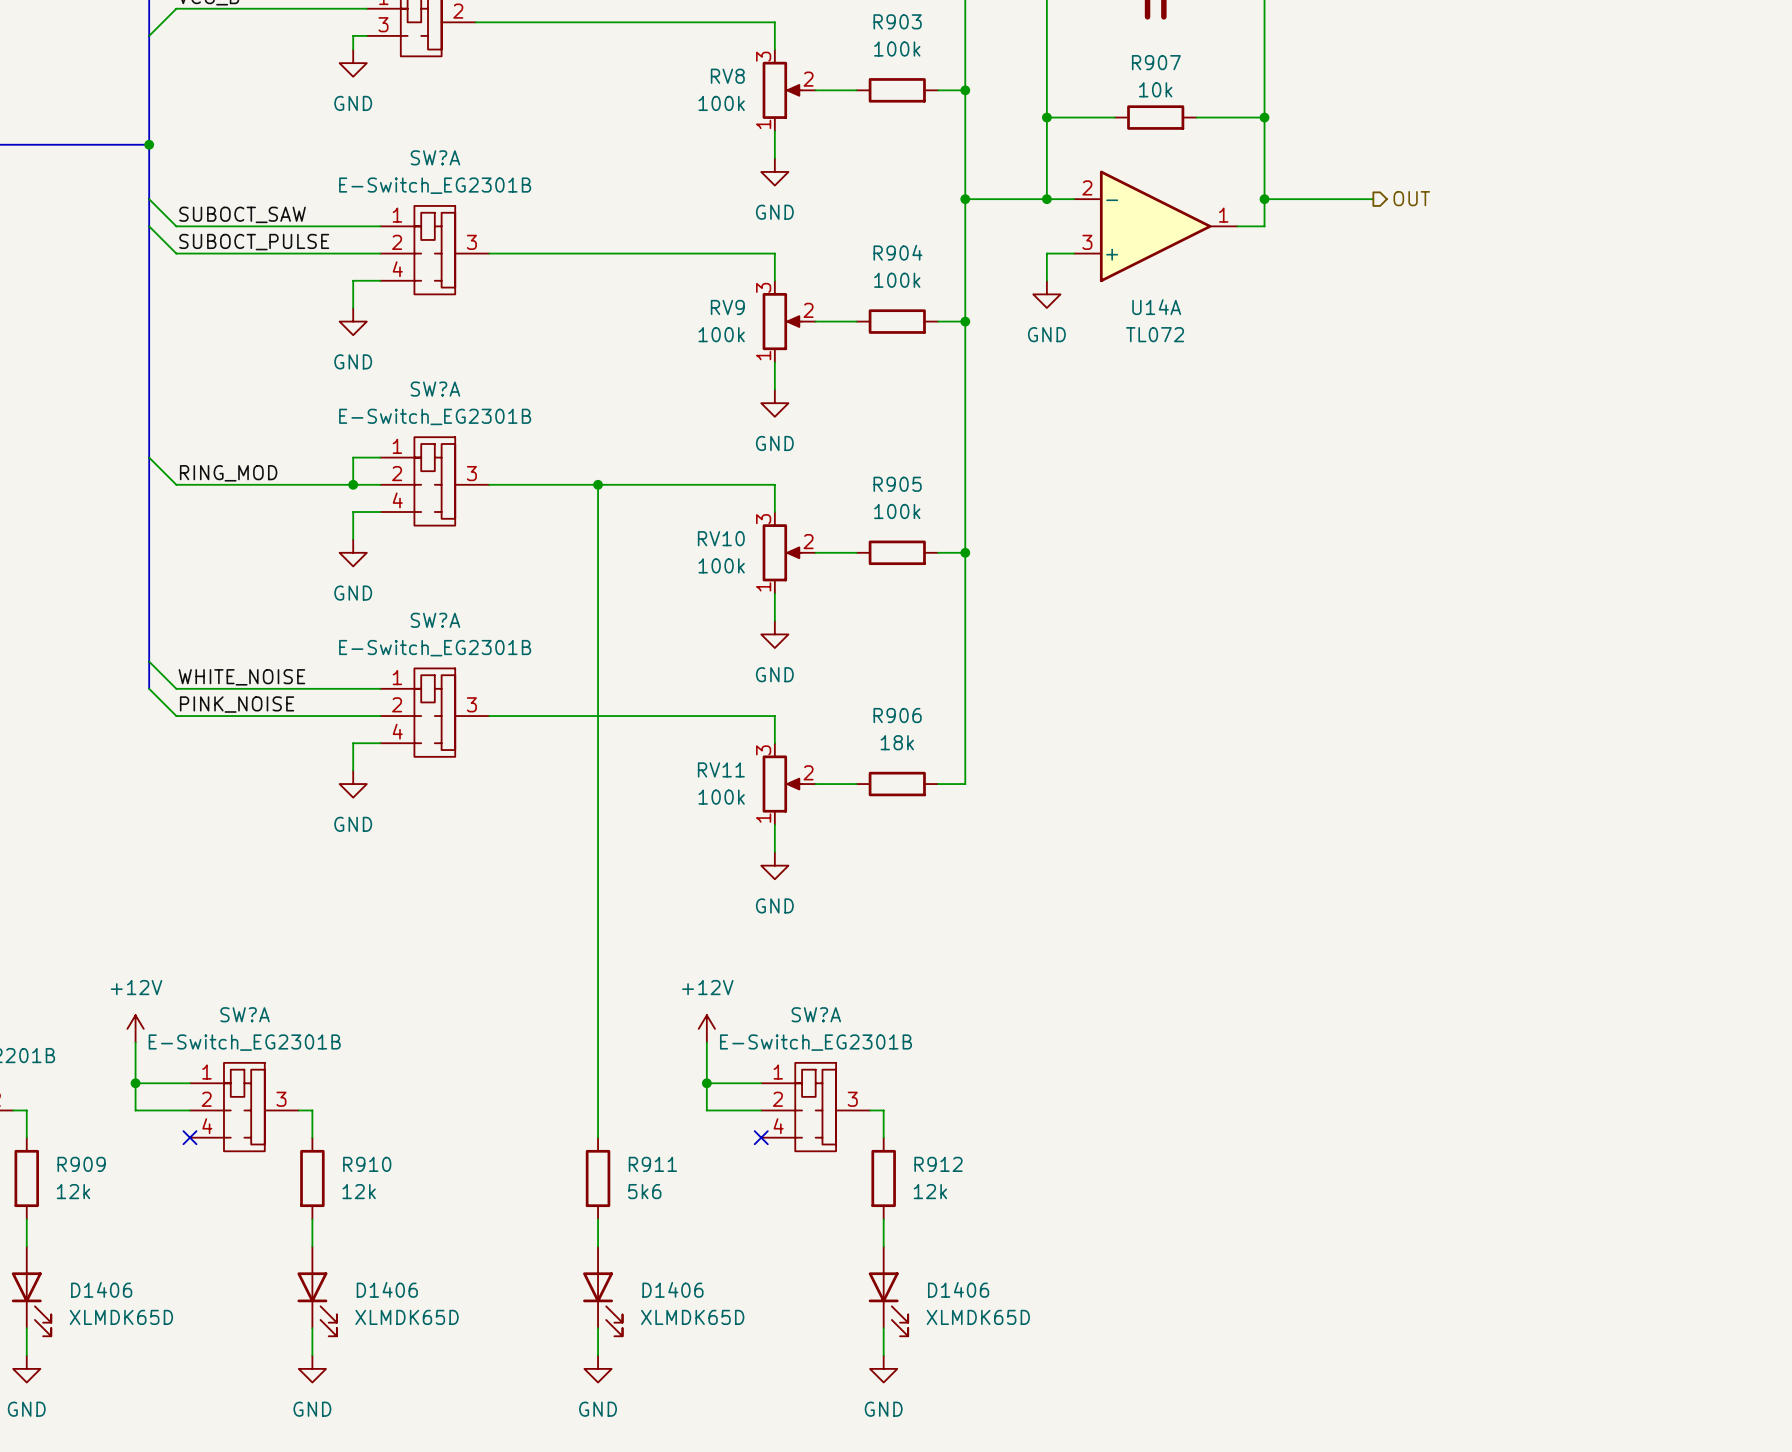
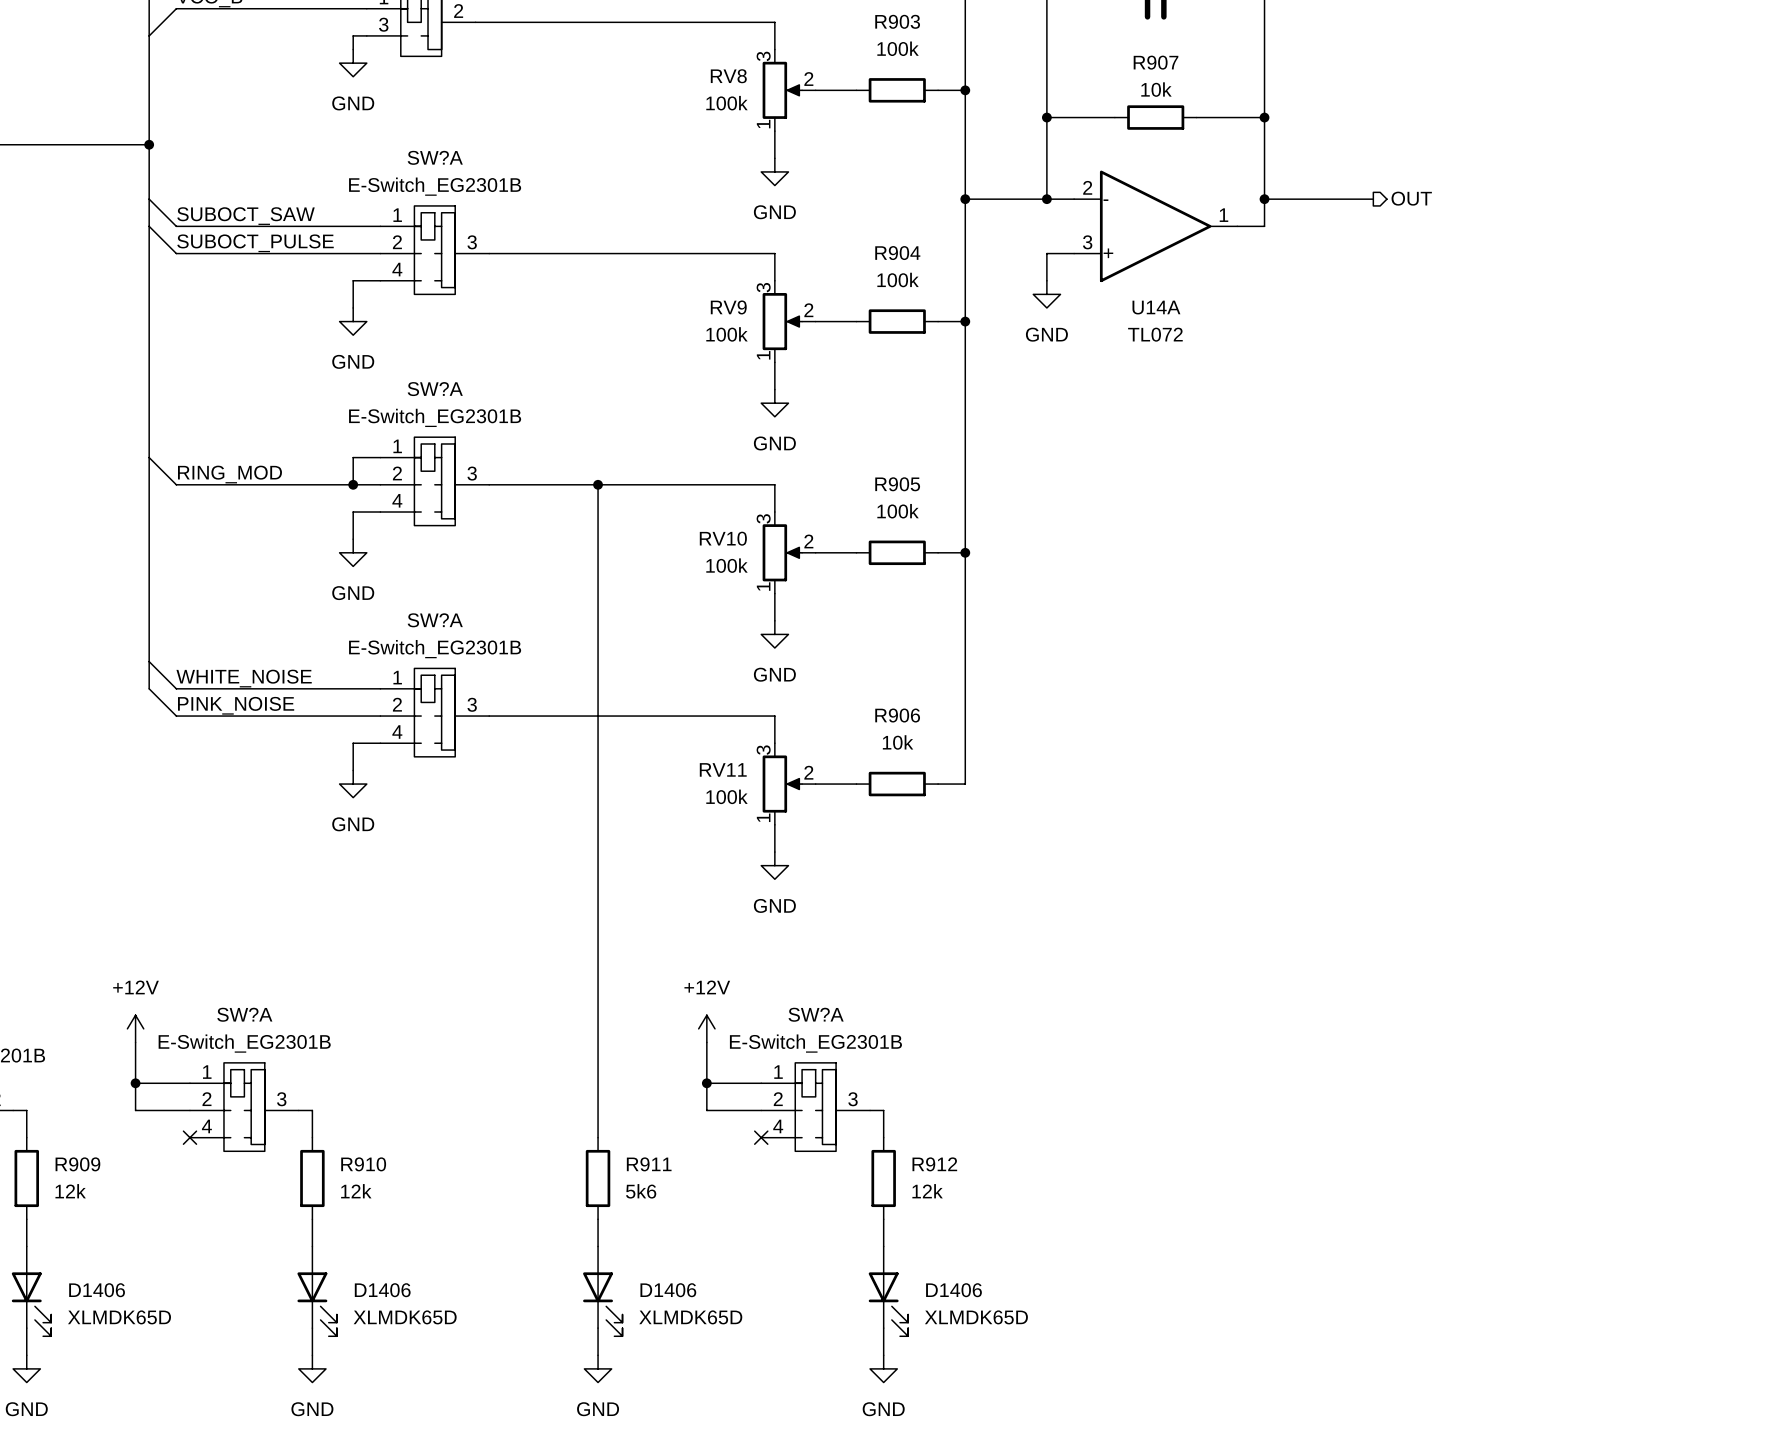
R906 value: 18k (897, 742) -> 10k (898, 742)

